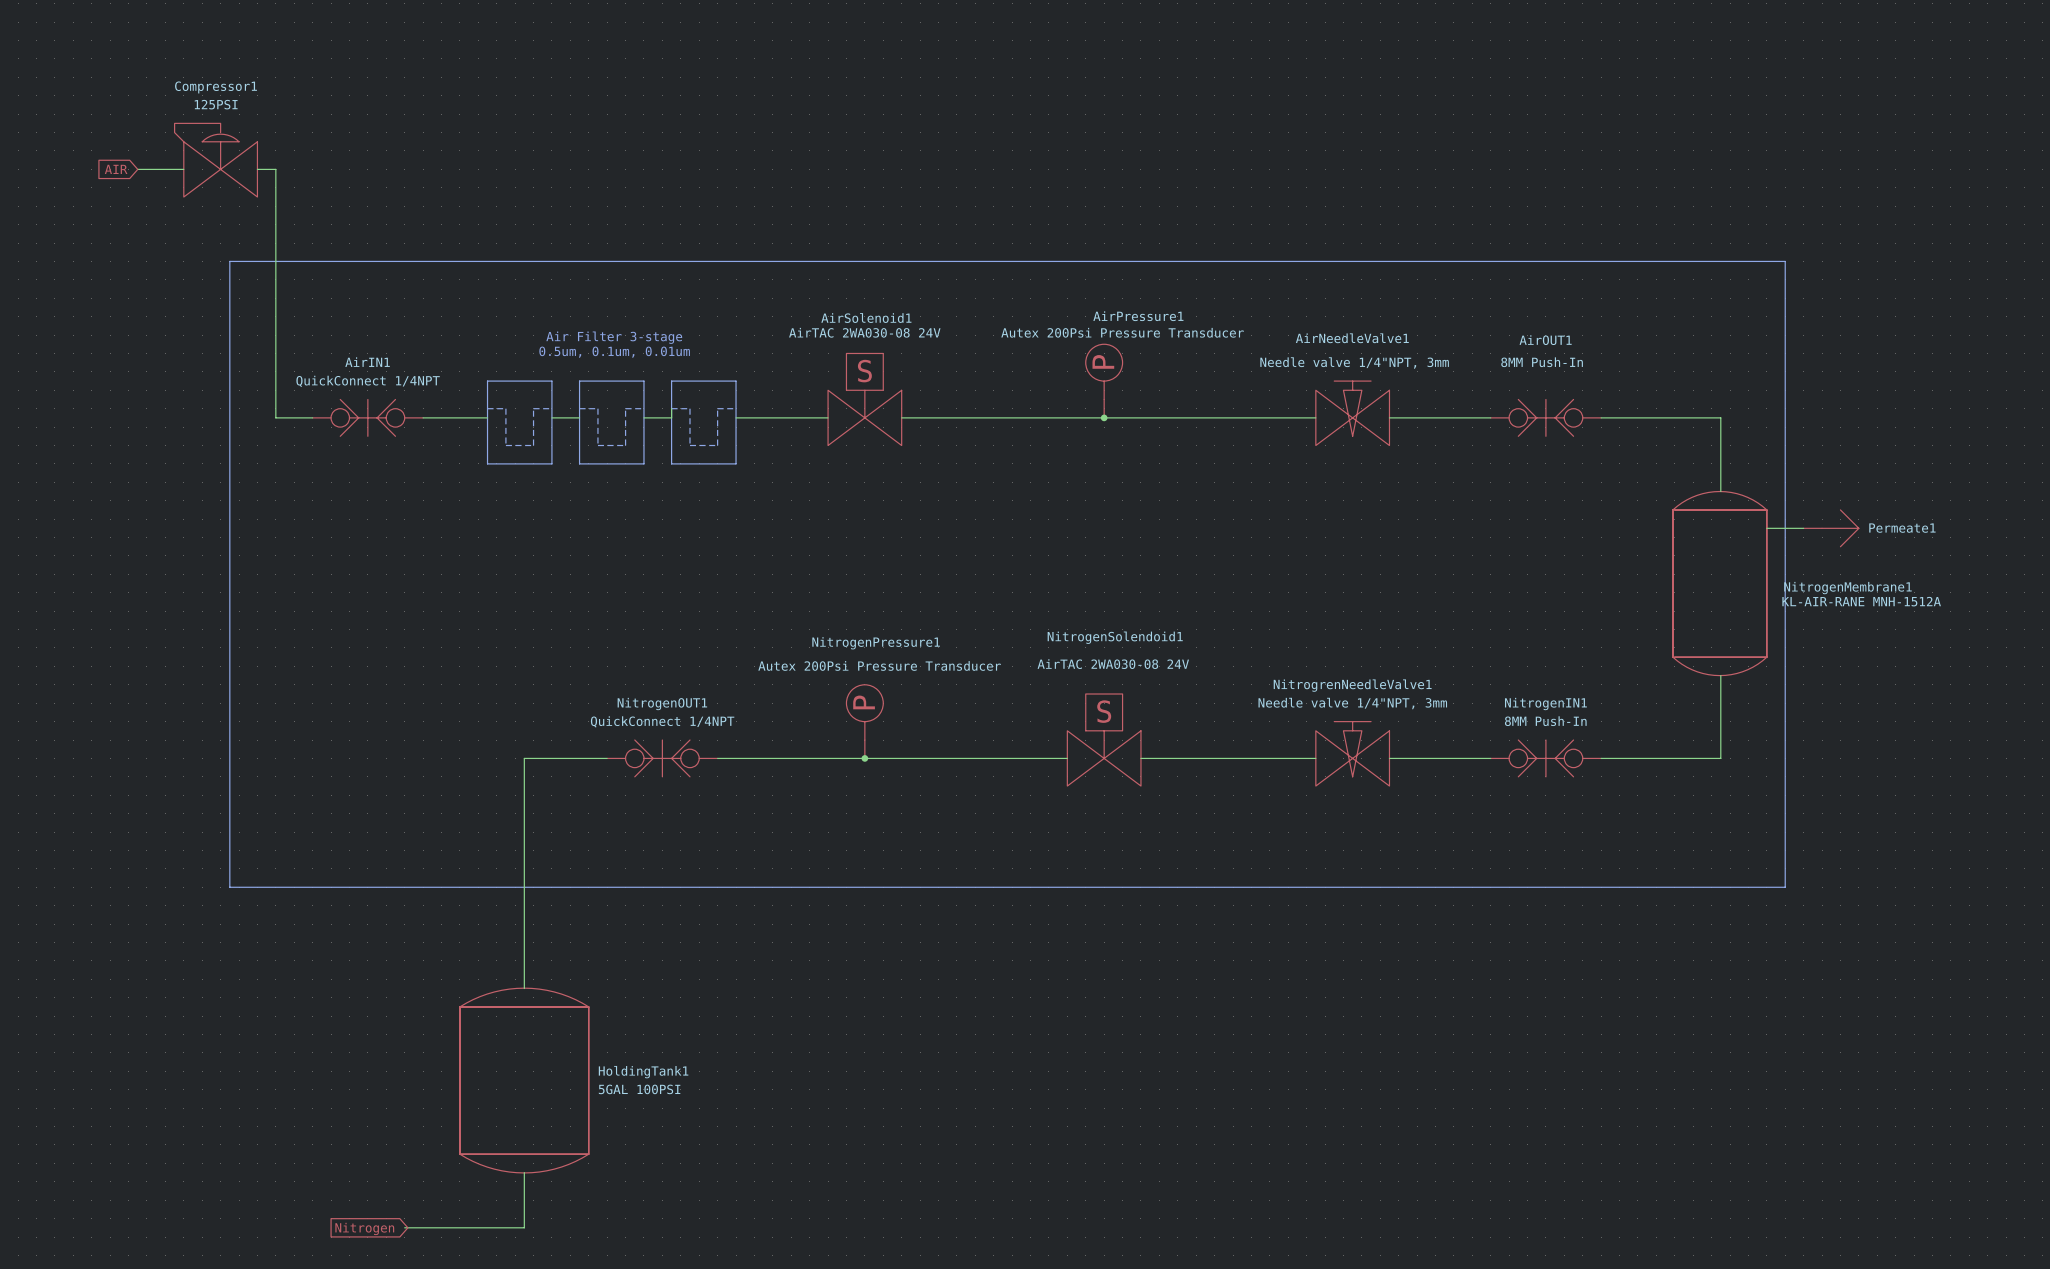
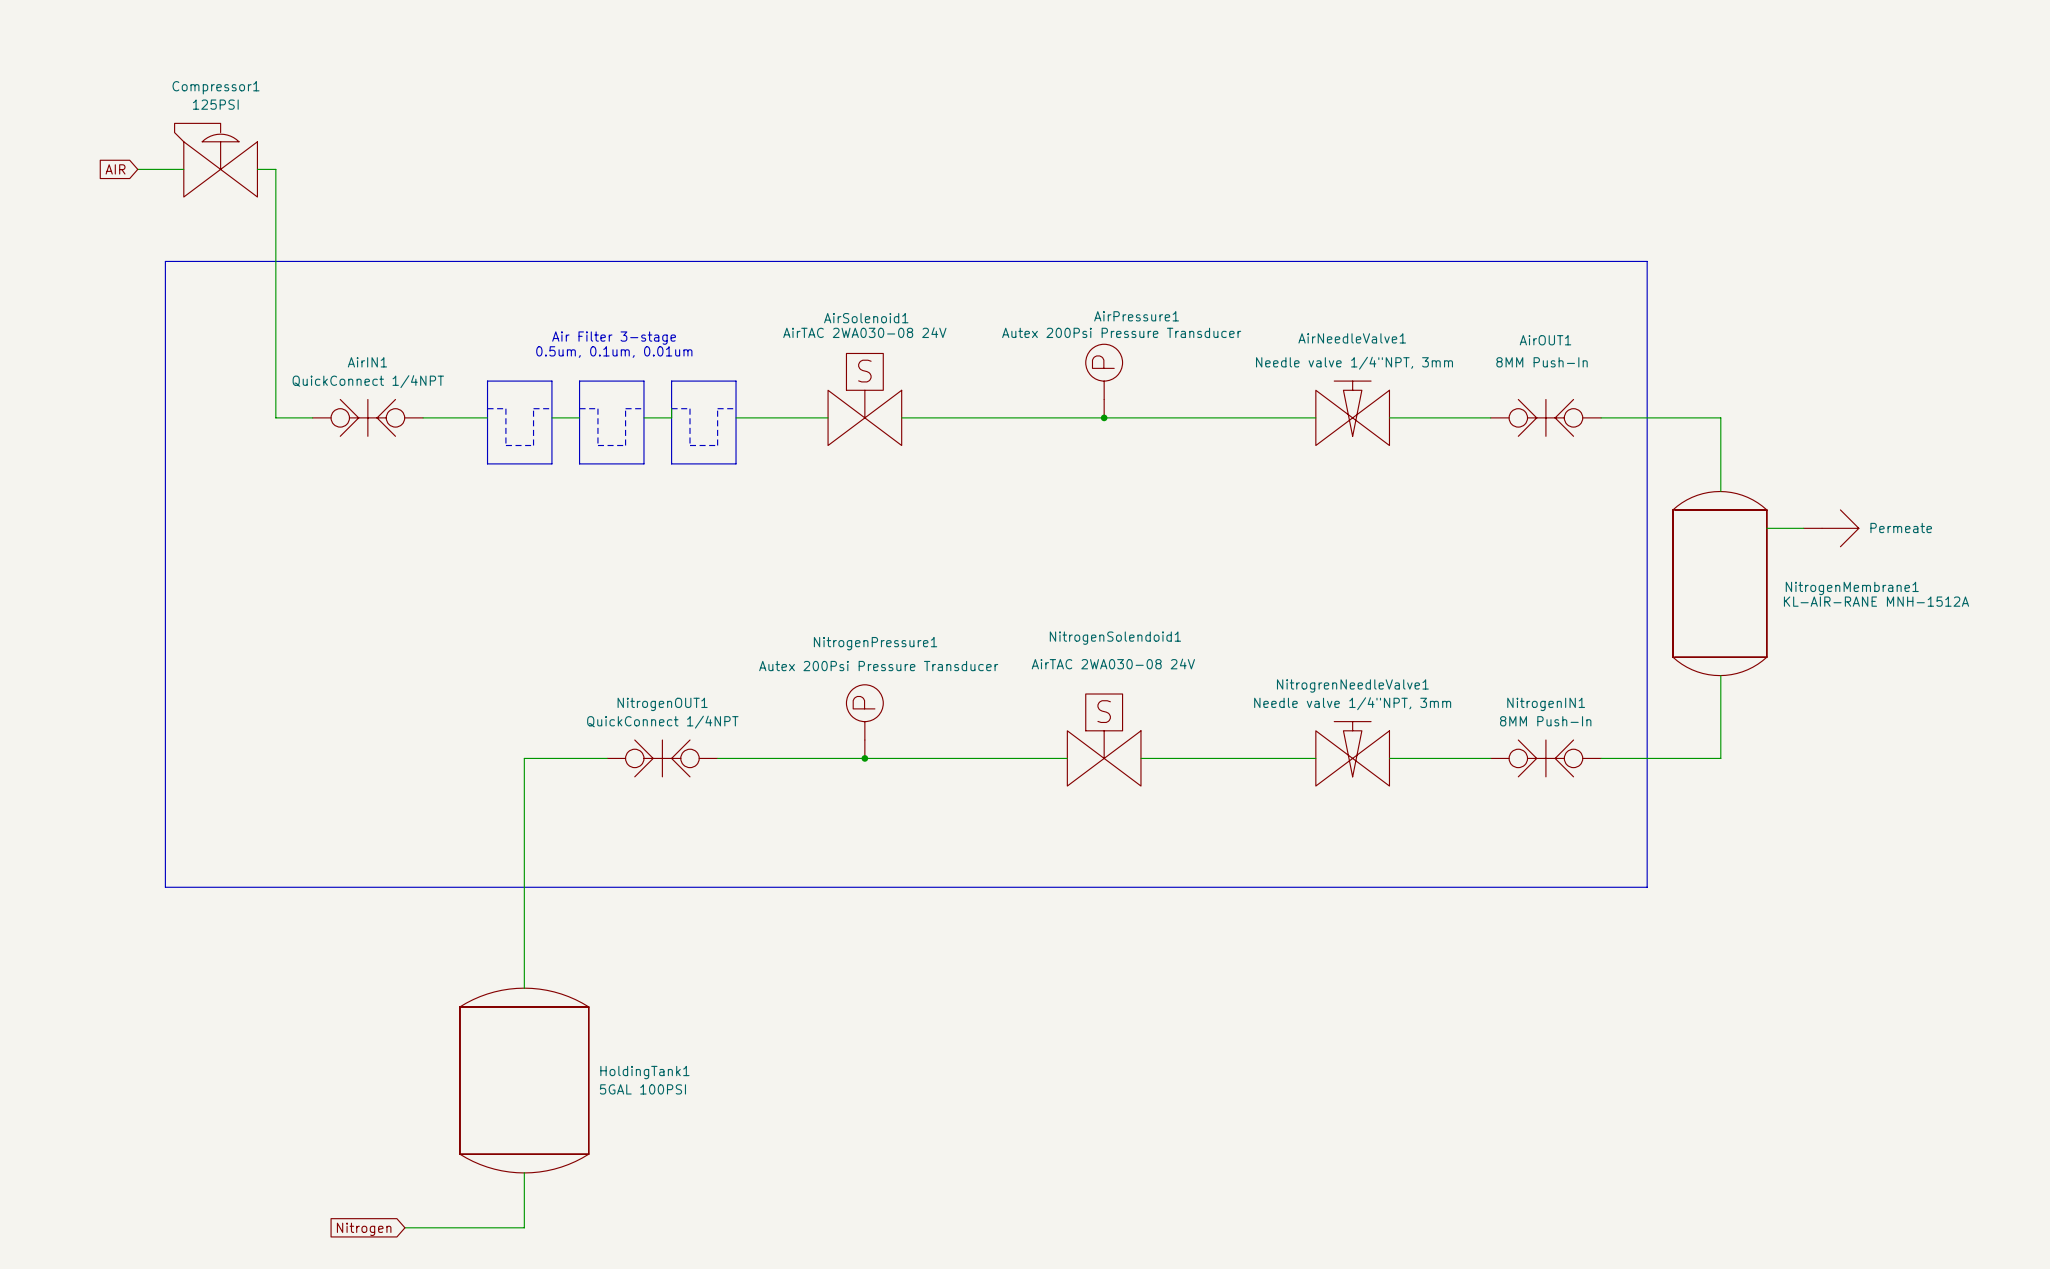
line: (229, 261) (229, 887) -> (229, 261) (165, 261) (165, 887) (229, 887)
line: (1647, 261) (1785, 261) (1785, 887) (1647, 887) -> (1647, 261) (1647, 887)
Permeate1 name: Permeate1 (1902, 528) -> Permeate (1901, 527)

